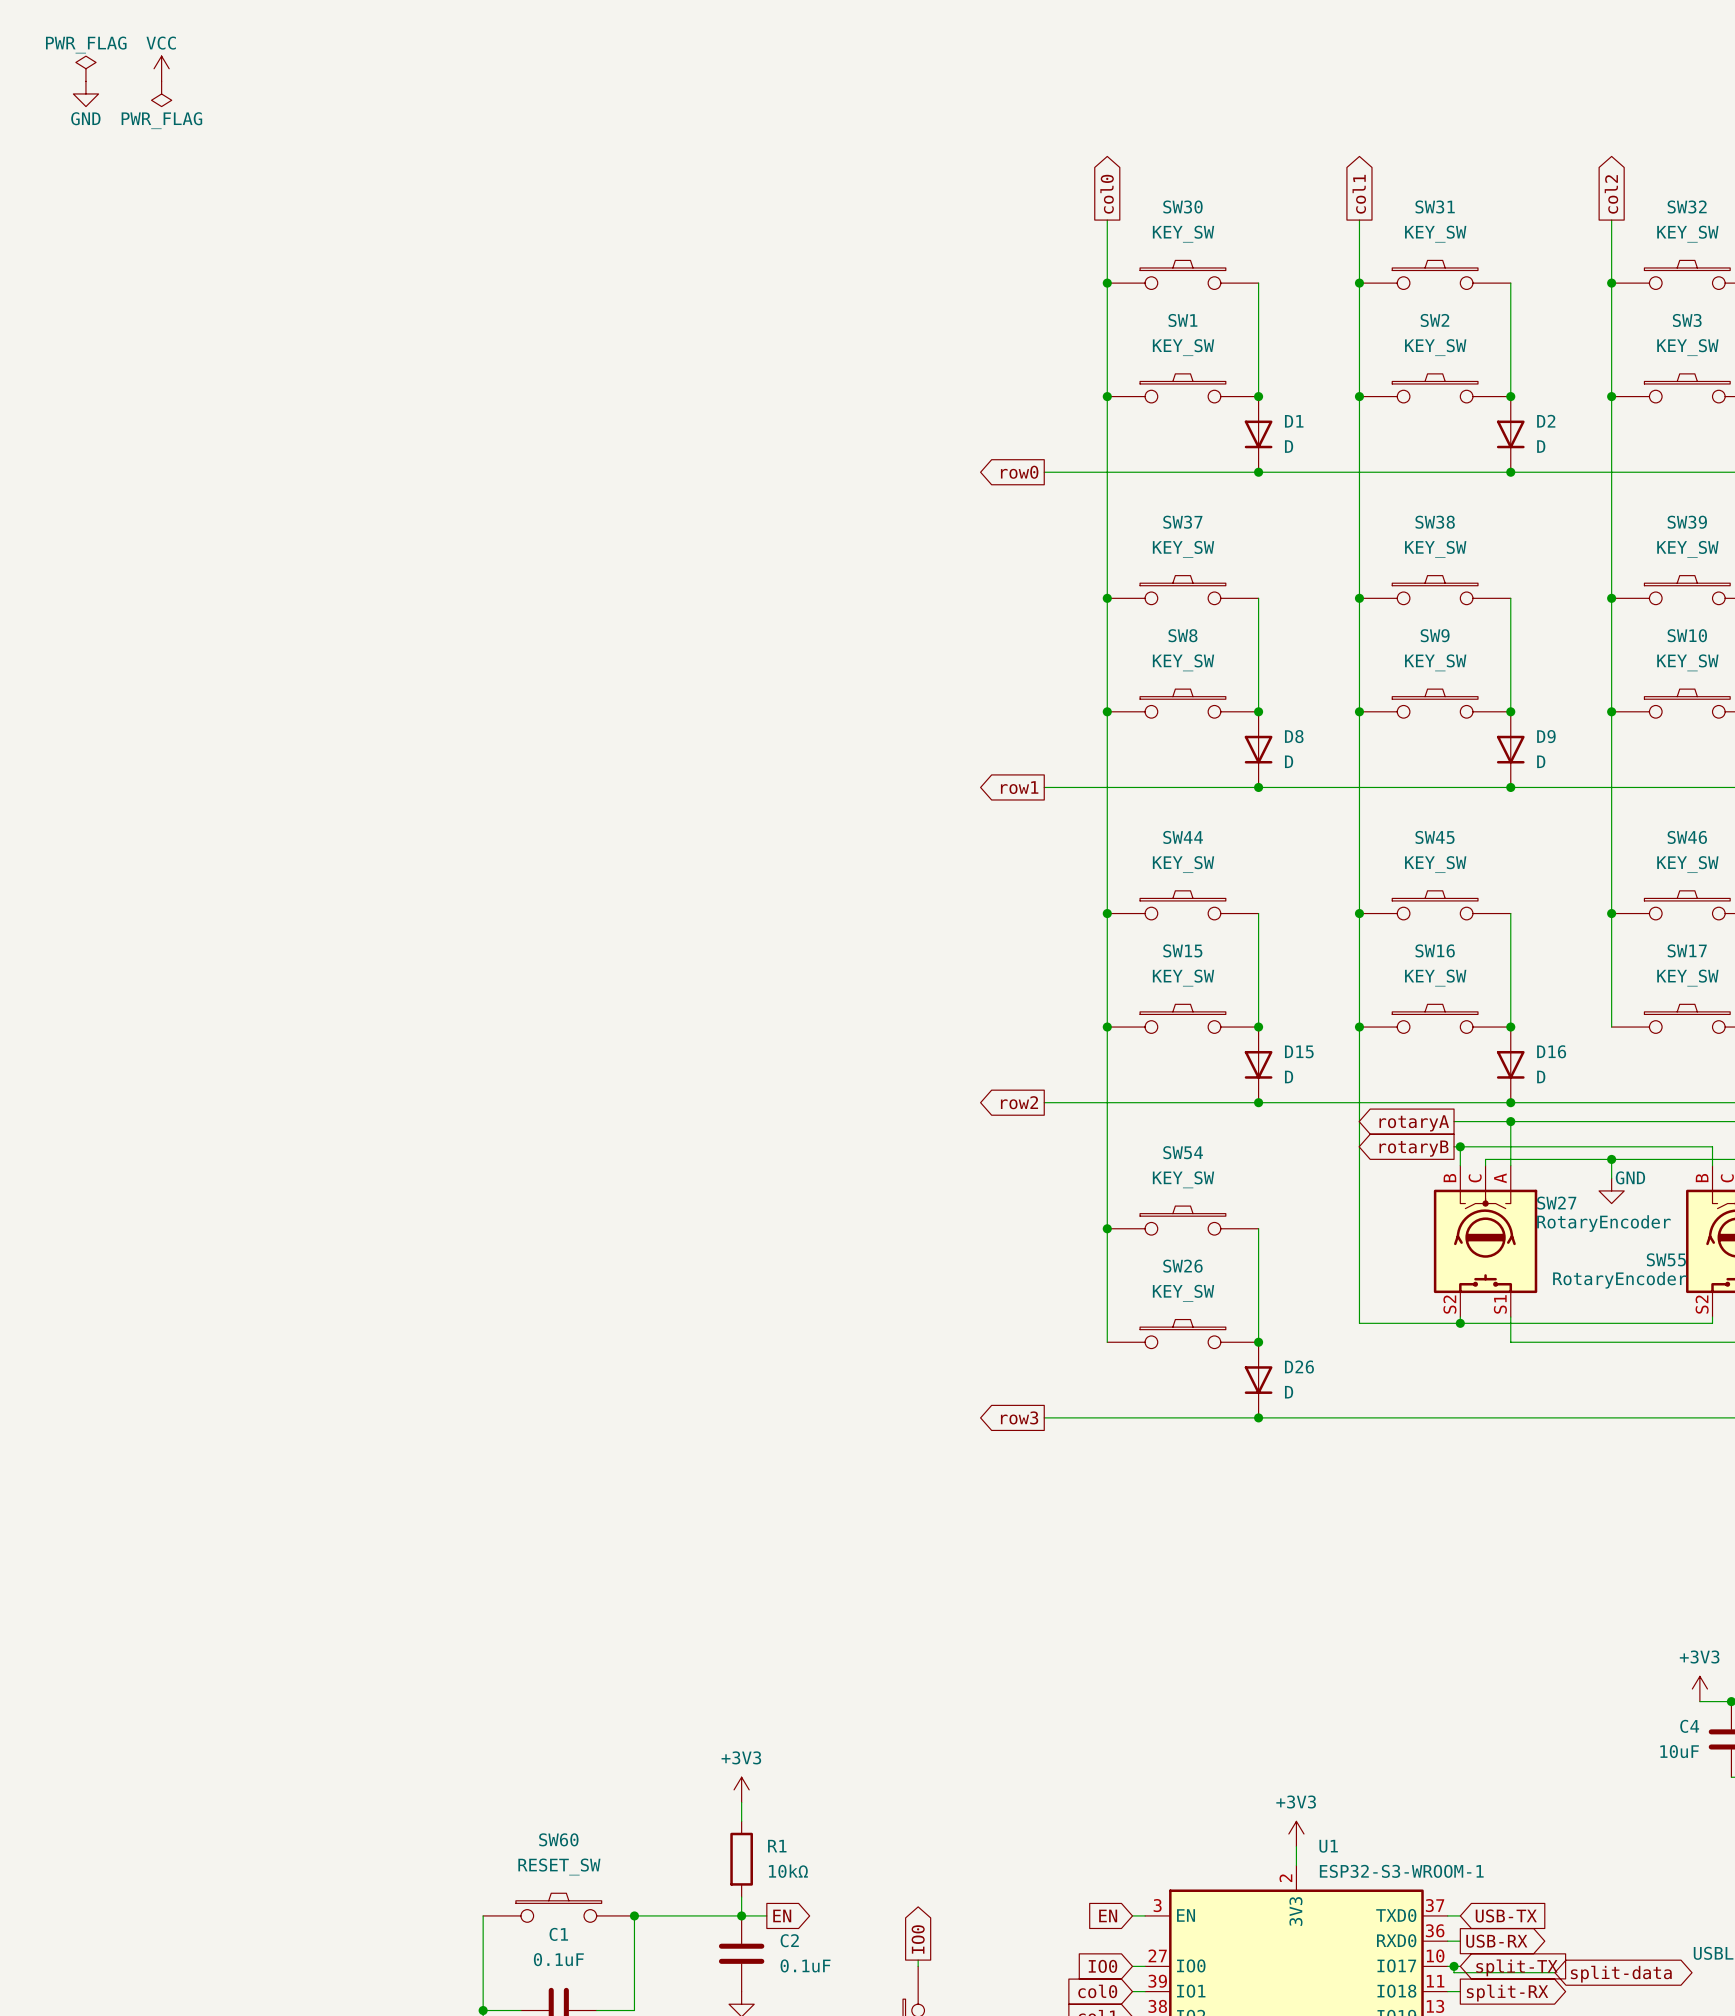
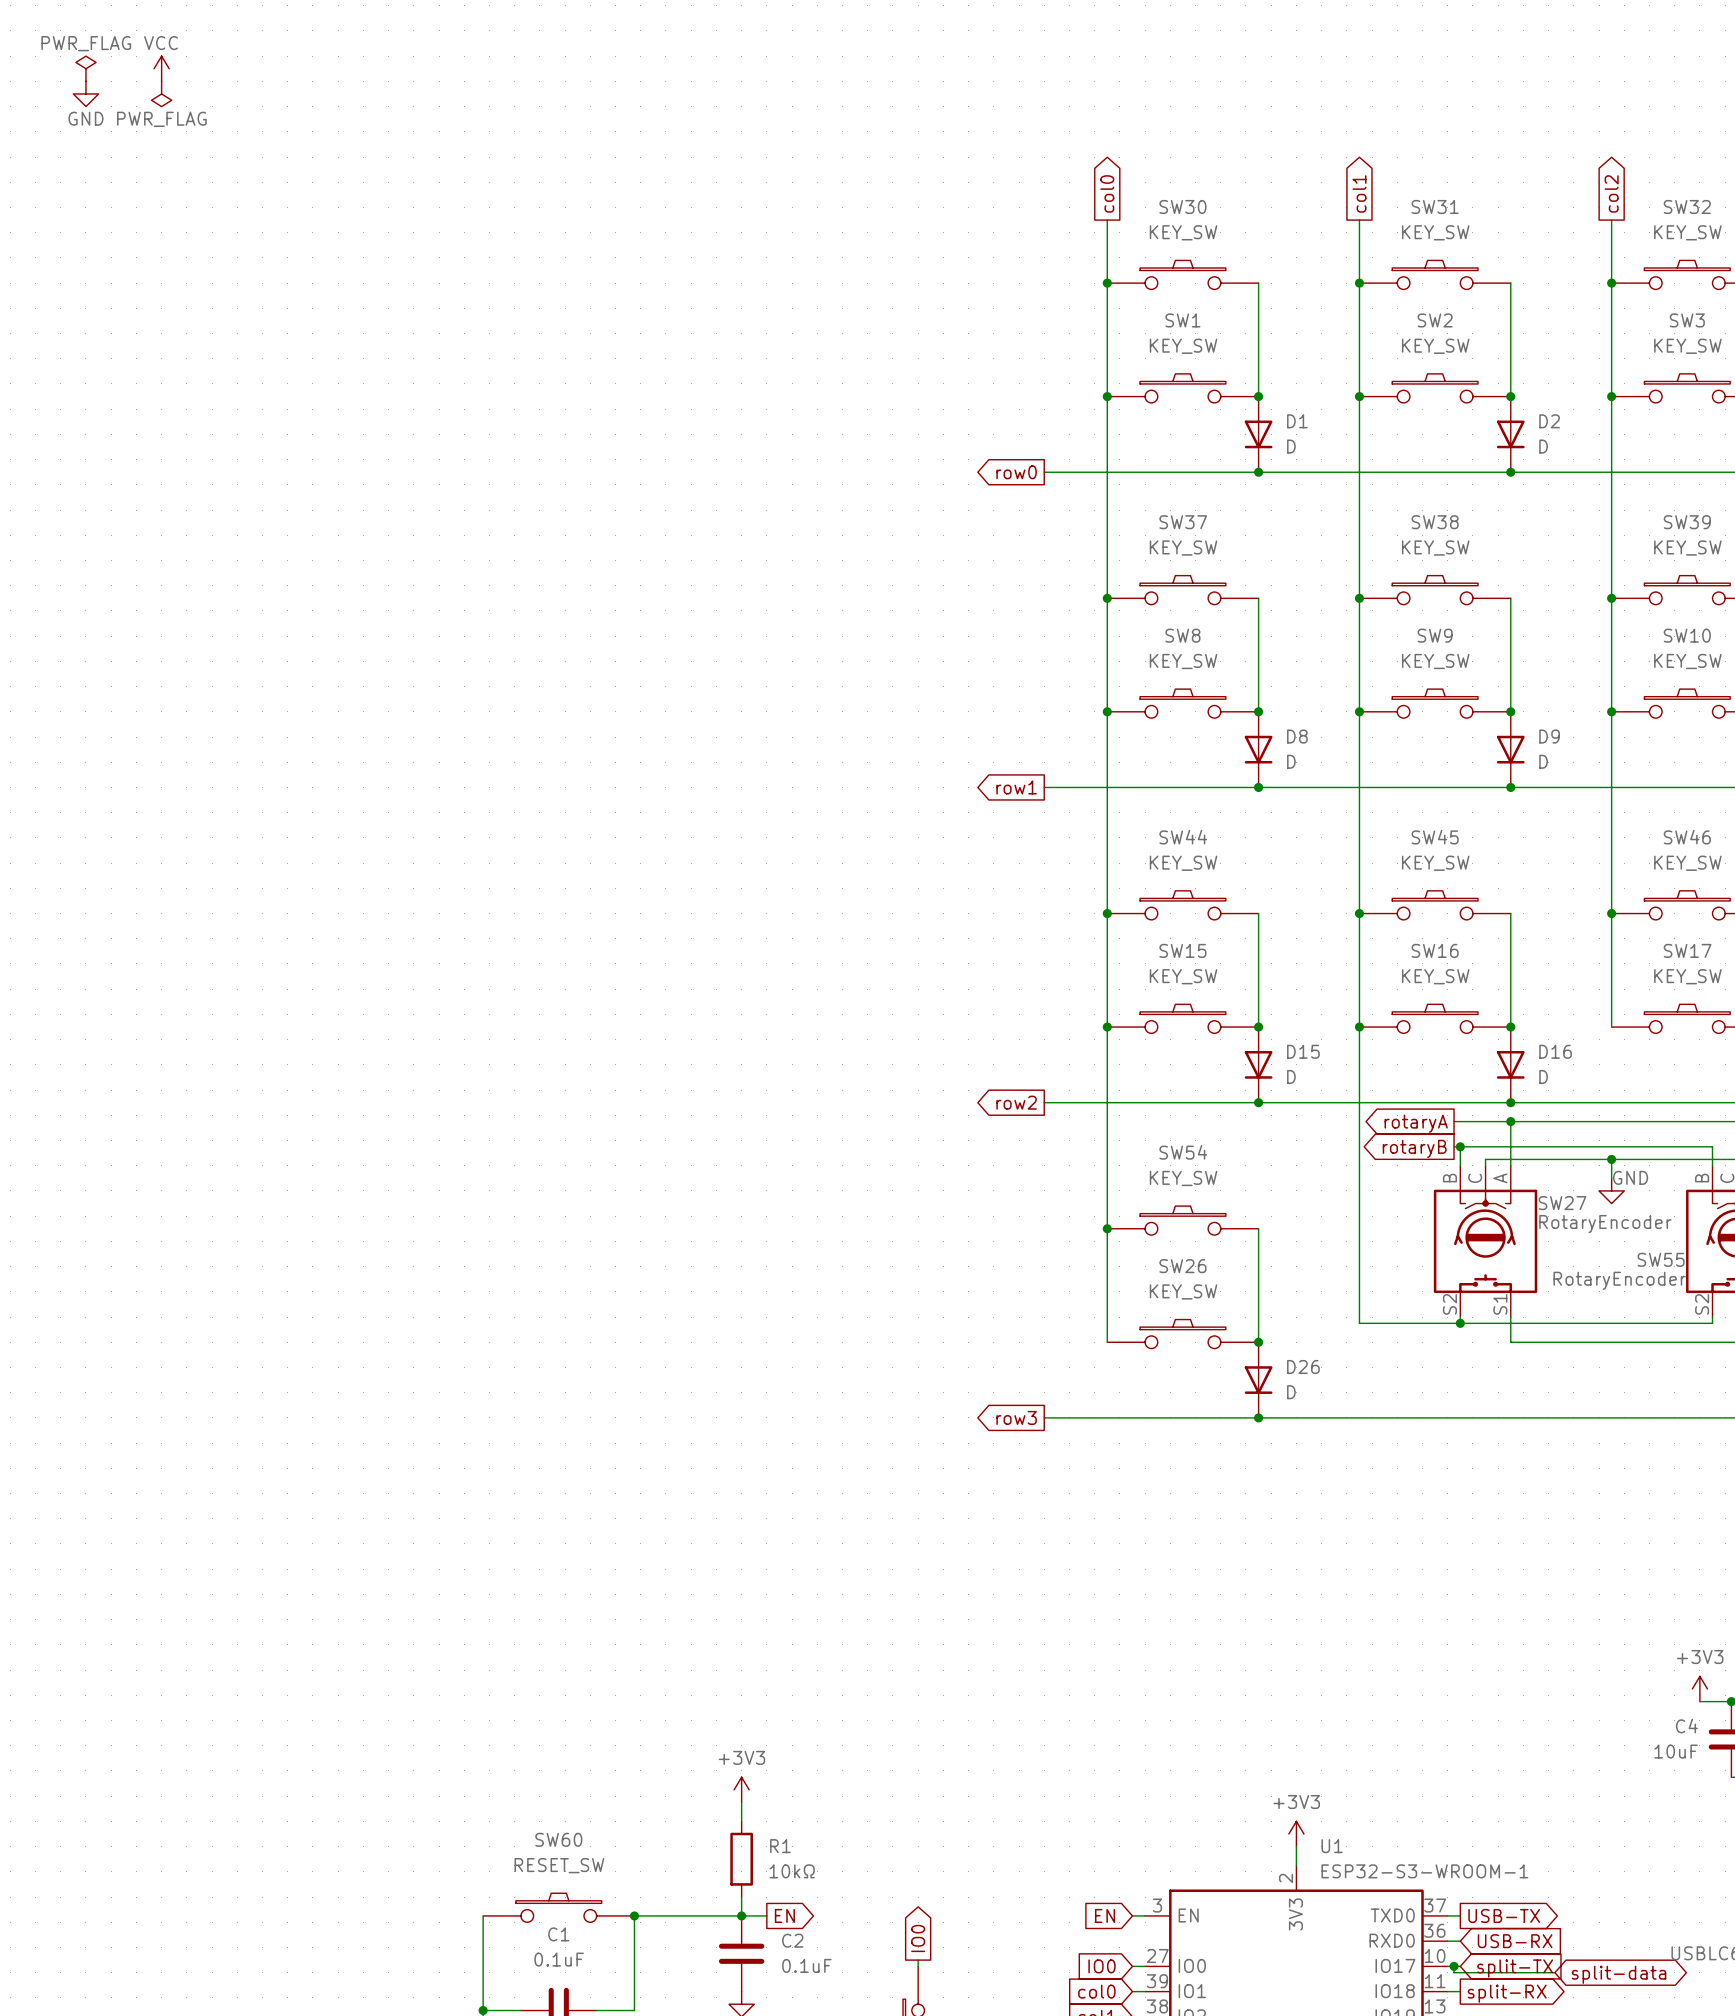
global label shape: input (1506, 1915) -> output (1504, 1915)
global label shape: output (1496, 1941) -> input (1515, 1941)

